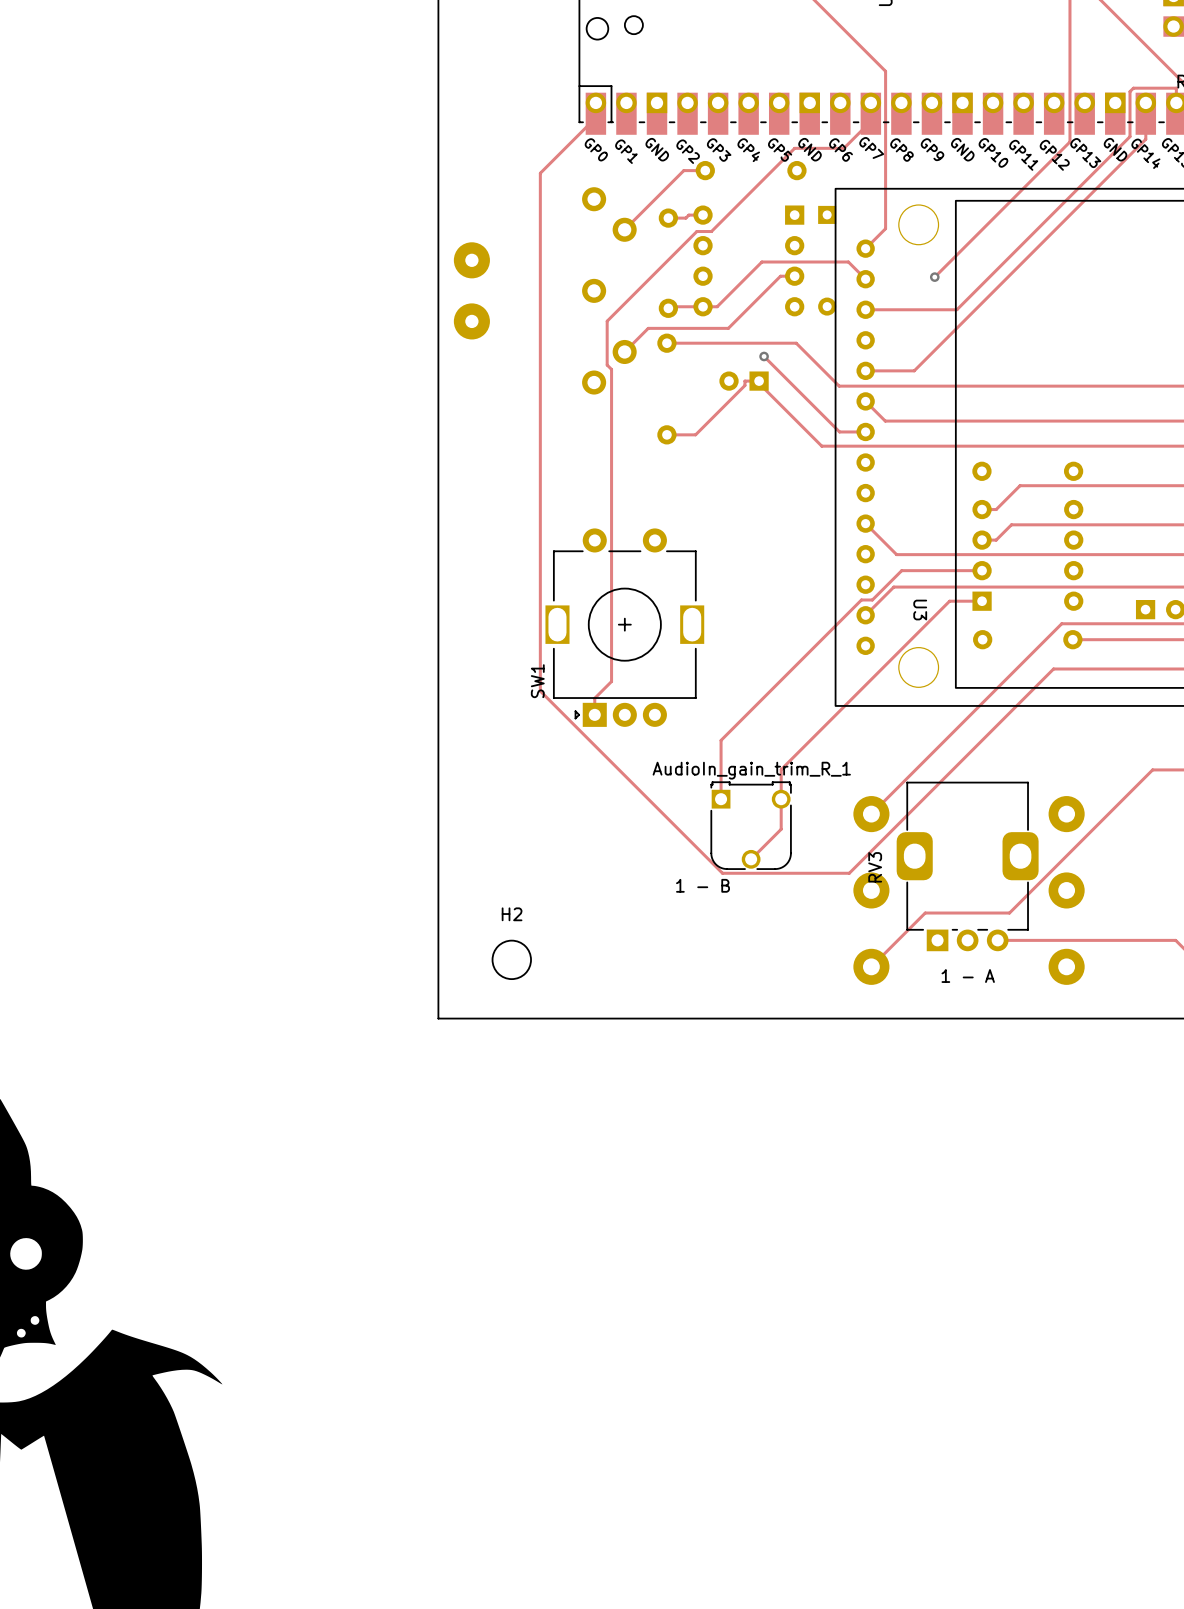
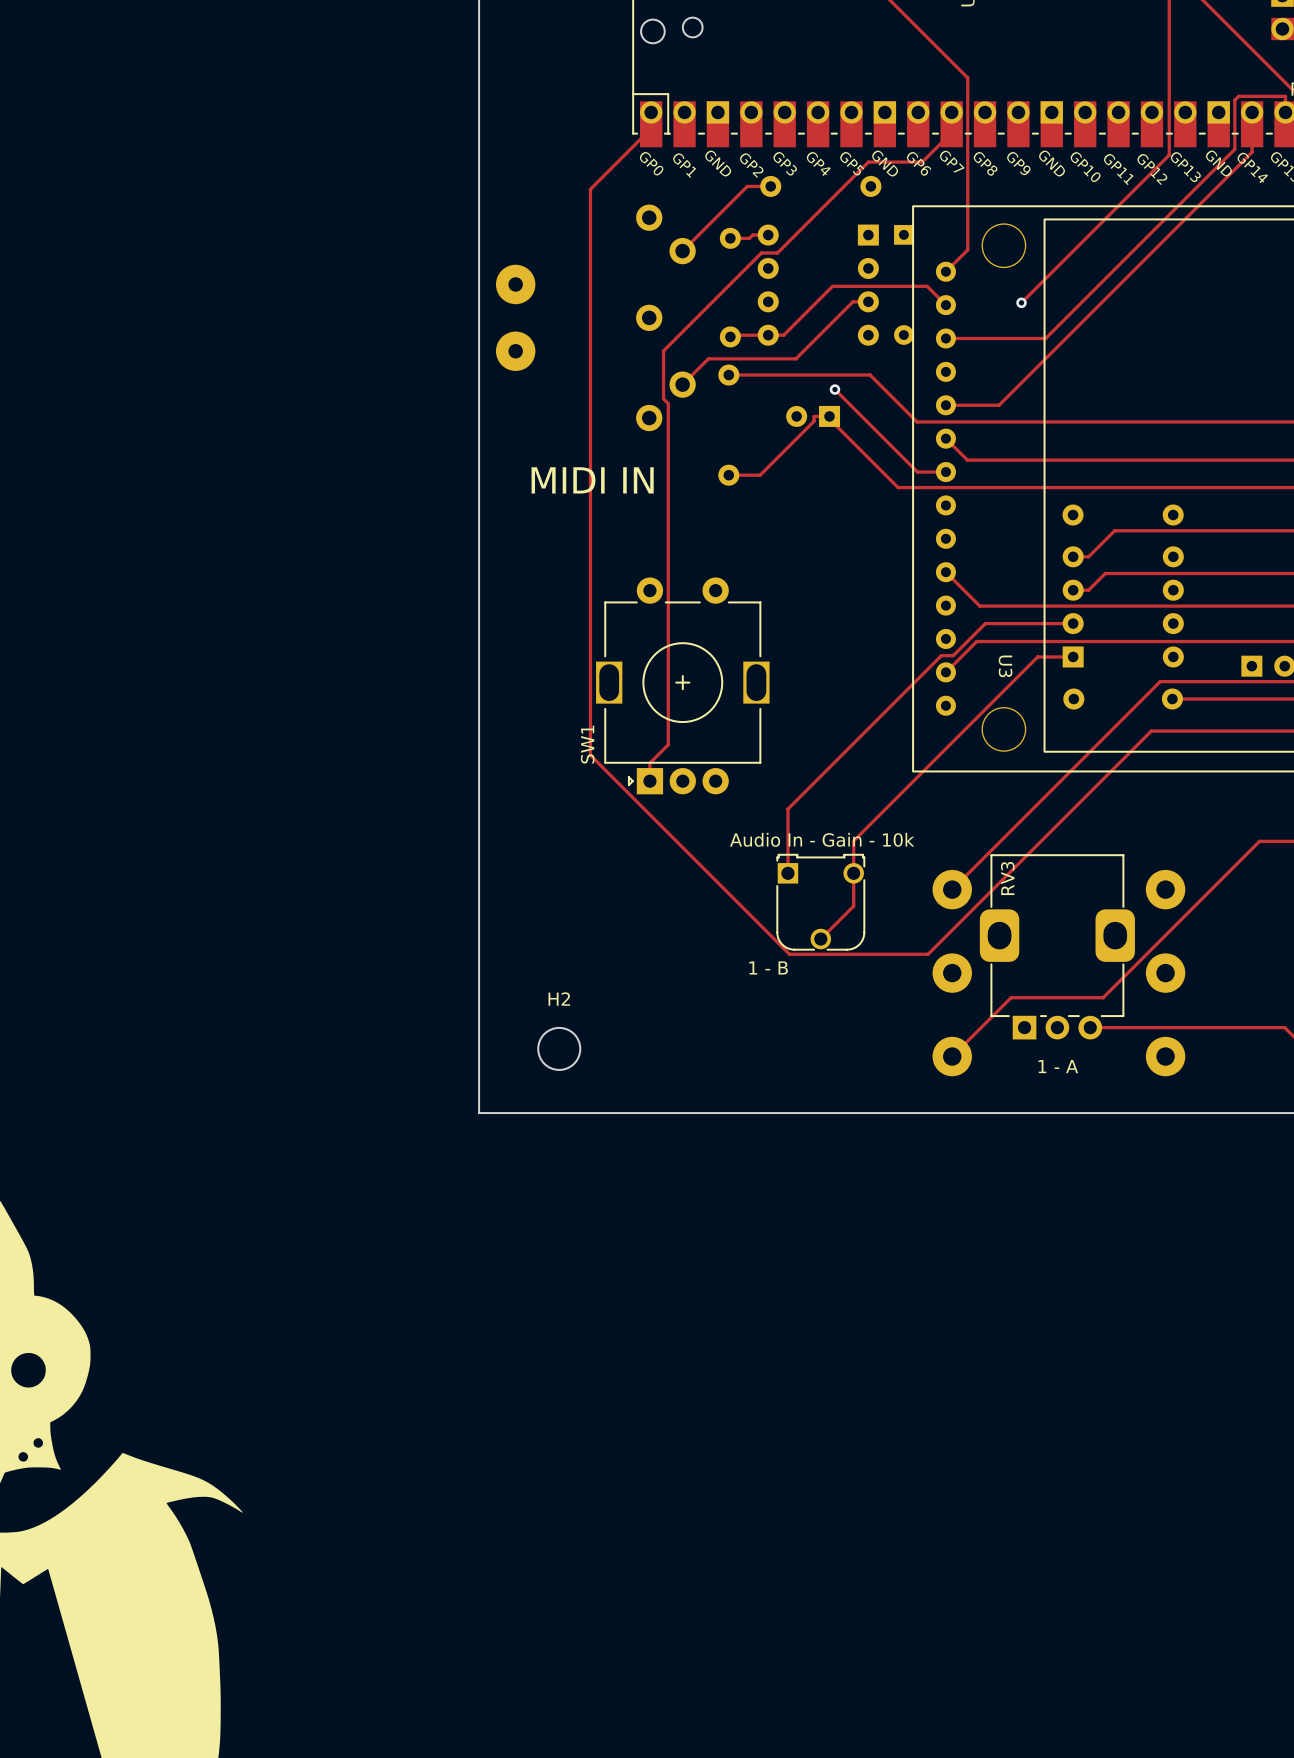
text: none -> MIDI IN (592, 480)
AudioIn_gain_trim_R_1 name: AudioIn_gain_trim_R_1 (751, 770) -> Audio In - Gain - 10k (822, 839)
RV3 name position: RV3 (875, 867) -> RV3 (1007, 878)

